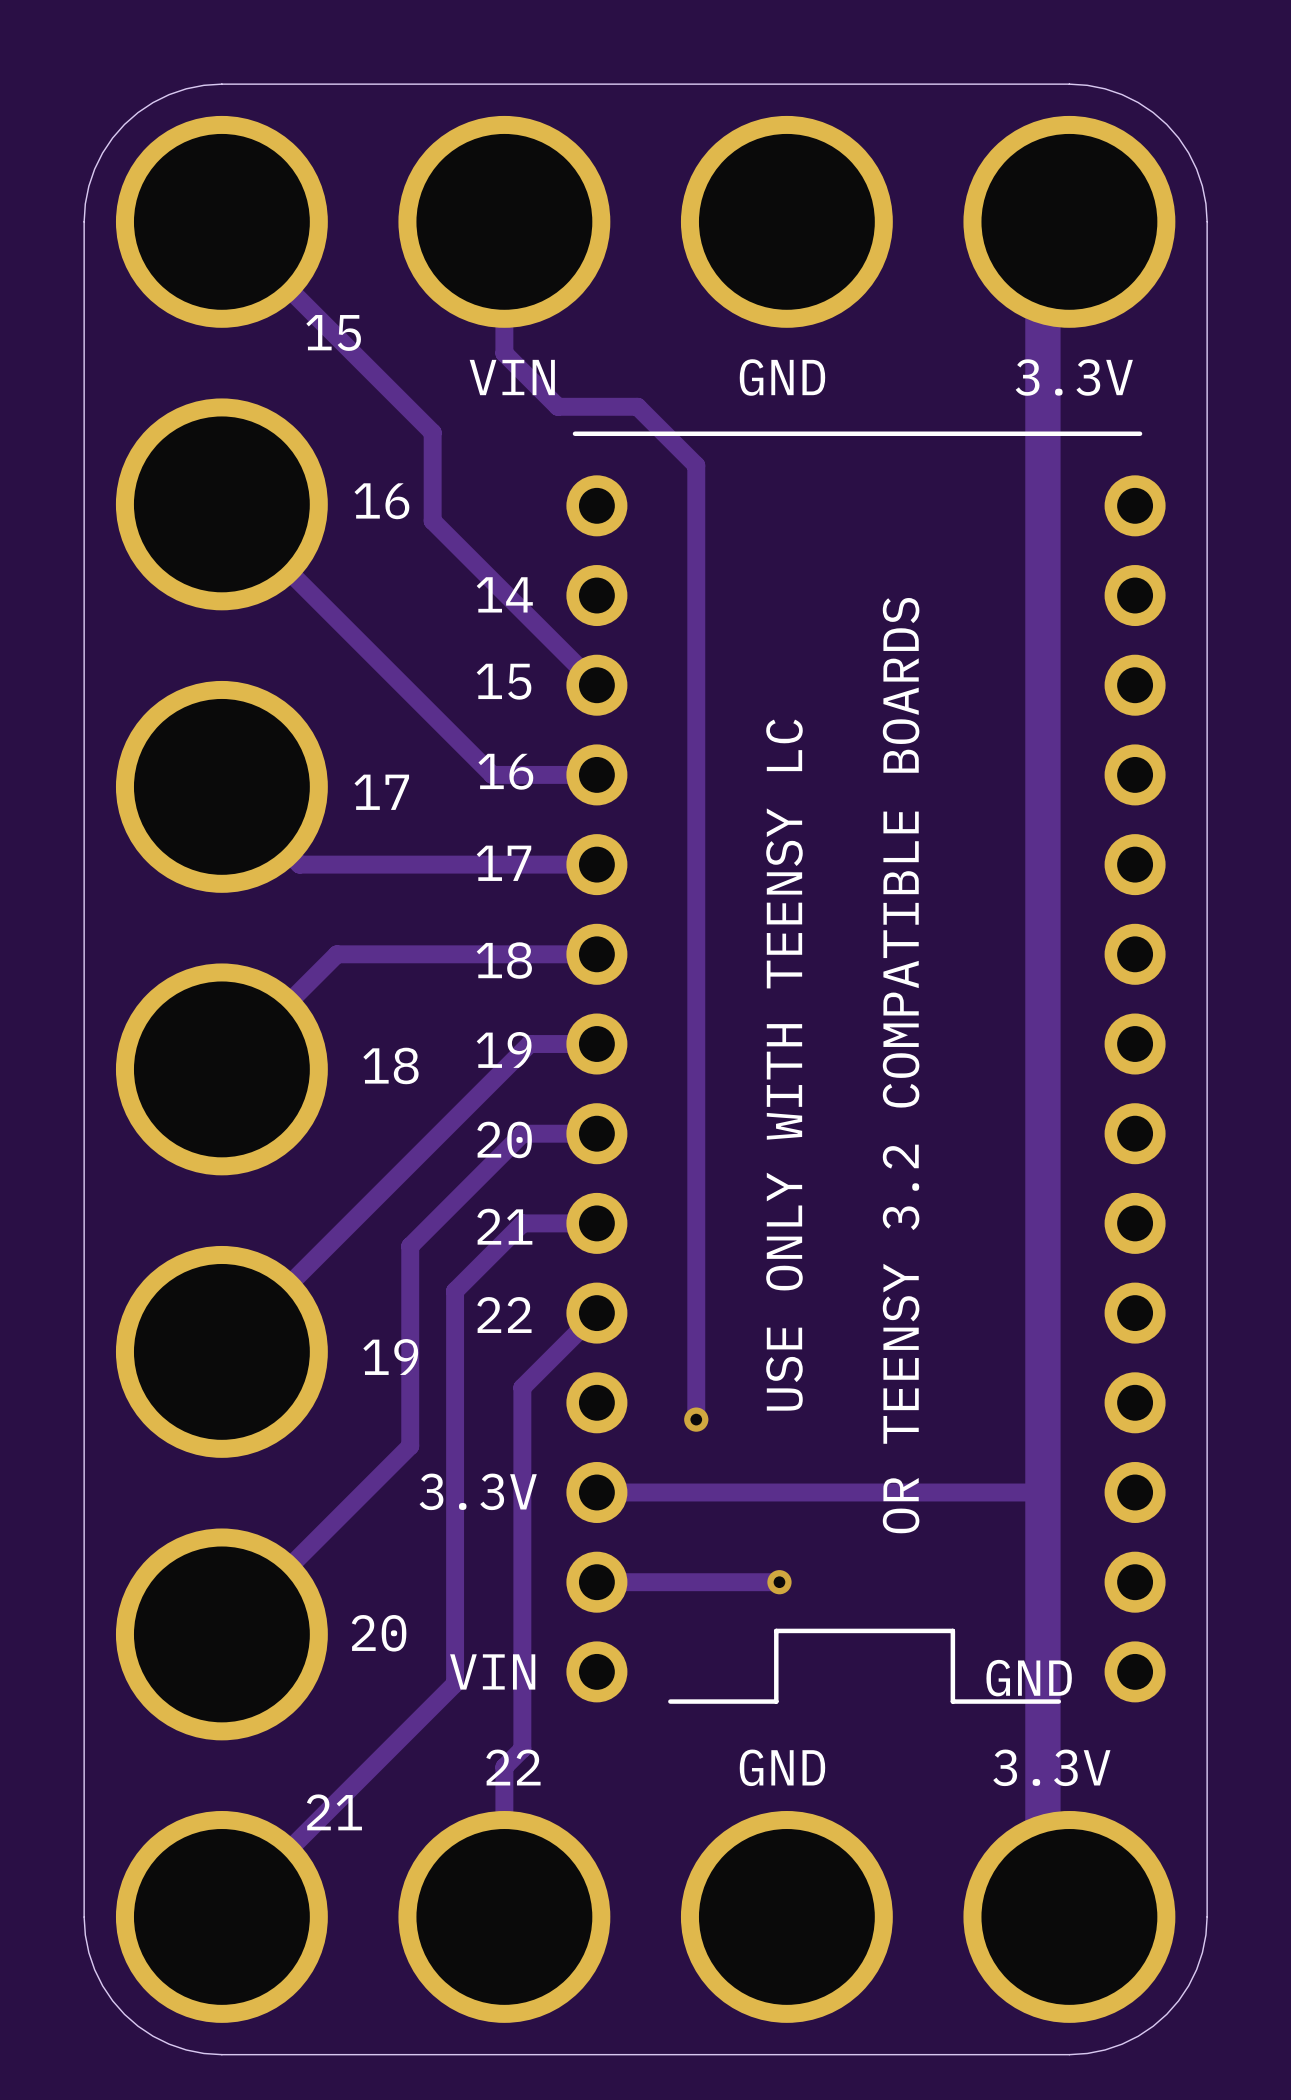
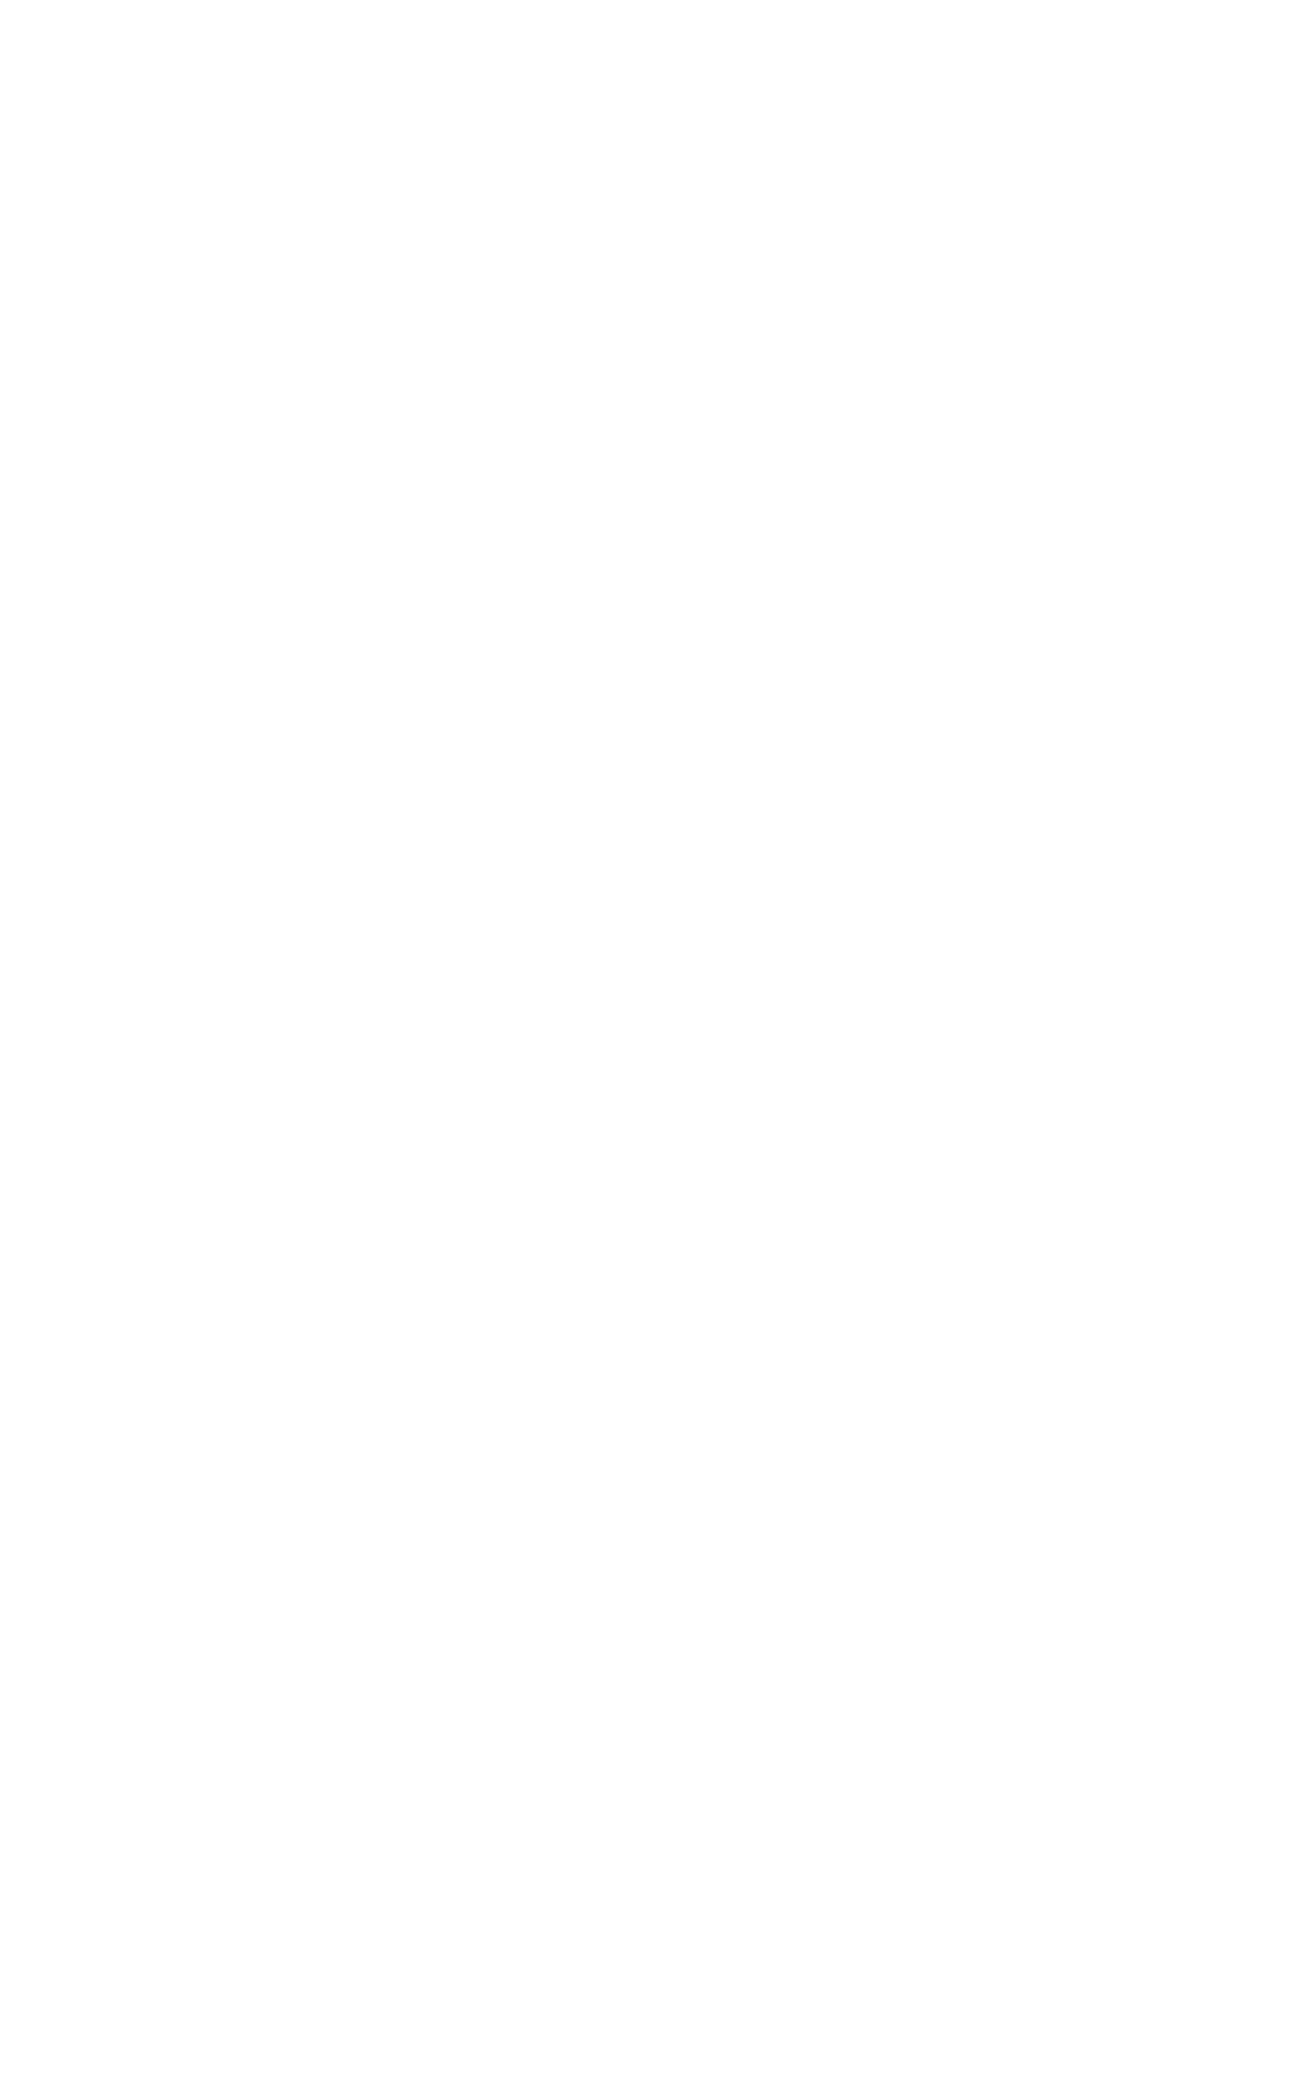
track: (221, 221) (432, 432) (432, 520) (596, 685) -> none
track: (504, 221) (504, 353) (557, 406) (637, 406) (696, 465) (696, 1419) -> none
track: (221, 504) (492, 774) (596, 774) -> none
track: (221, 786) (299, 864) (596, 864) -> none
track: (596, 954) (336, 954) (221, 1069) -> none
track: (596, 1044) (529, 1044) (221, 1351) -> none
part: (645, 1069) -> none
track: (596, 1133) (522, 1133) (410, 1246) (410, 1446) (221, 1634) -> none
track: (596, 1223) (522, 1223) (455, 1291) (455, 1683) (221, 1916) -> none
track: (596, 1313) (522, 1387) (522, 1749) (504, 1767) (504, 1916) -> none
via: (696, 1419) -> none
track: (596, 1492) (1037, 1492) -> none
track: (596, 1582) (779, 1582) -> none
via: (779, 1582) -> none

